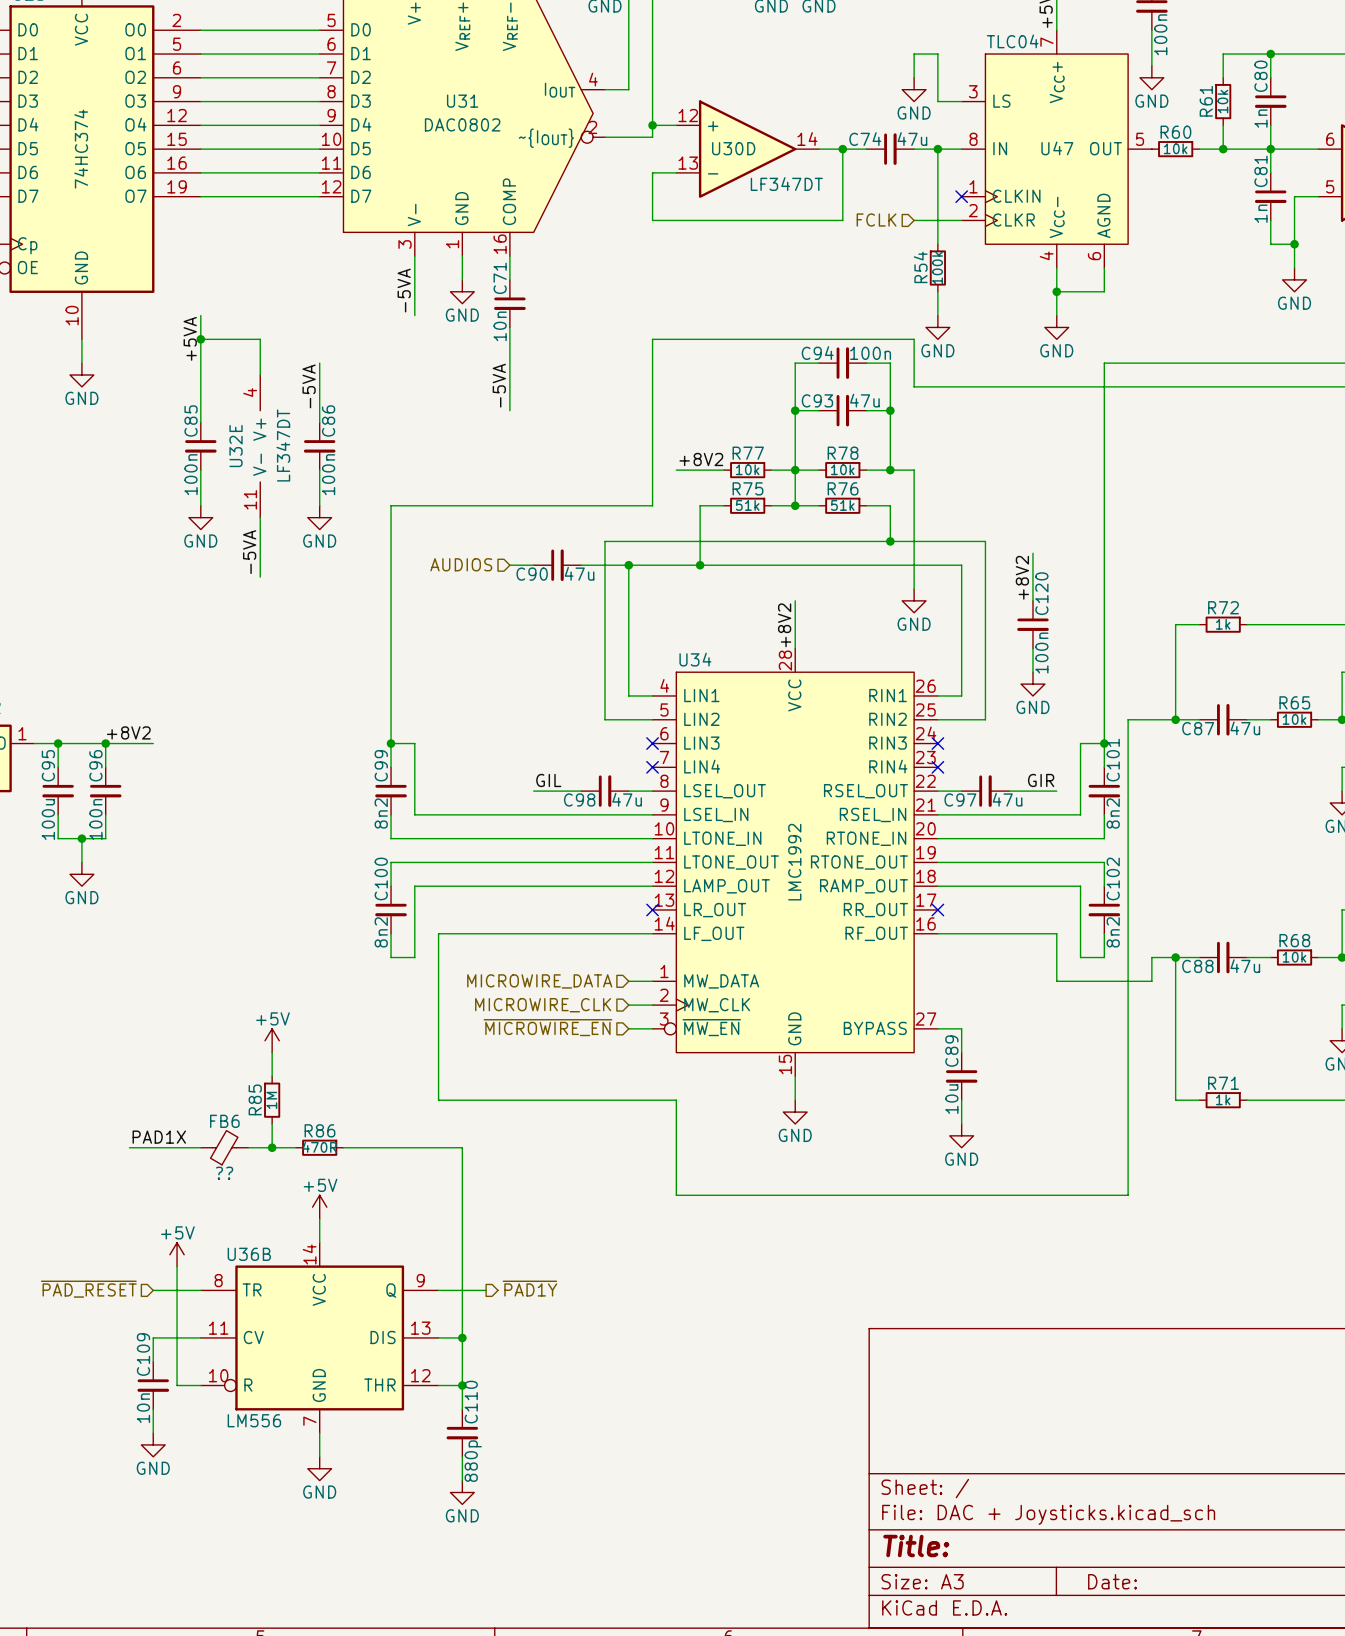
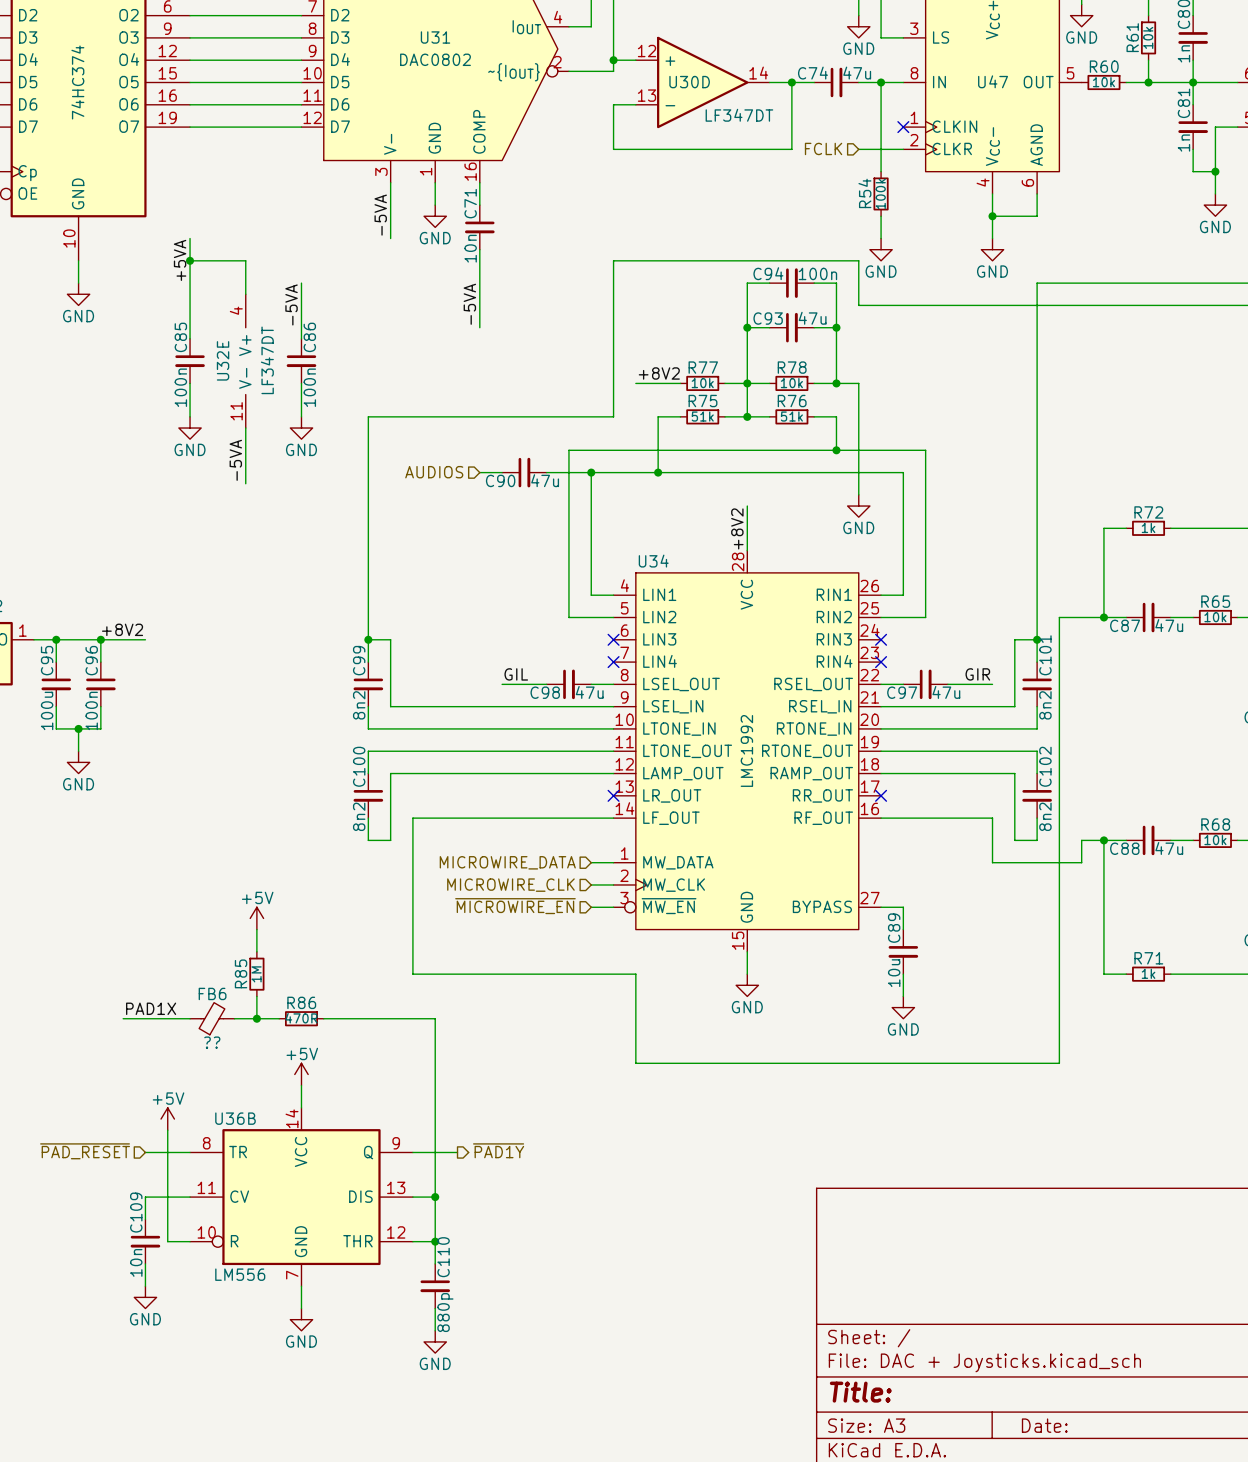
wire: (1032, 553) (1032, 600) -> none
label: +8V2 (1022, 577) -> none
C120: 100n (1032, 624) -> none
wire: (1032, 648) (1032, 672) -> none
power symbol: GND (1032, 684) -> none

